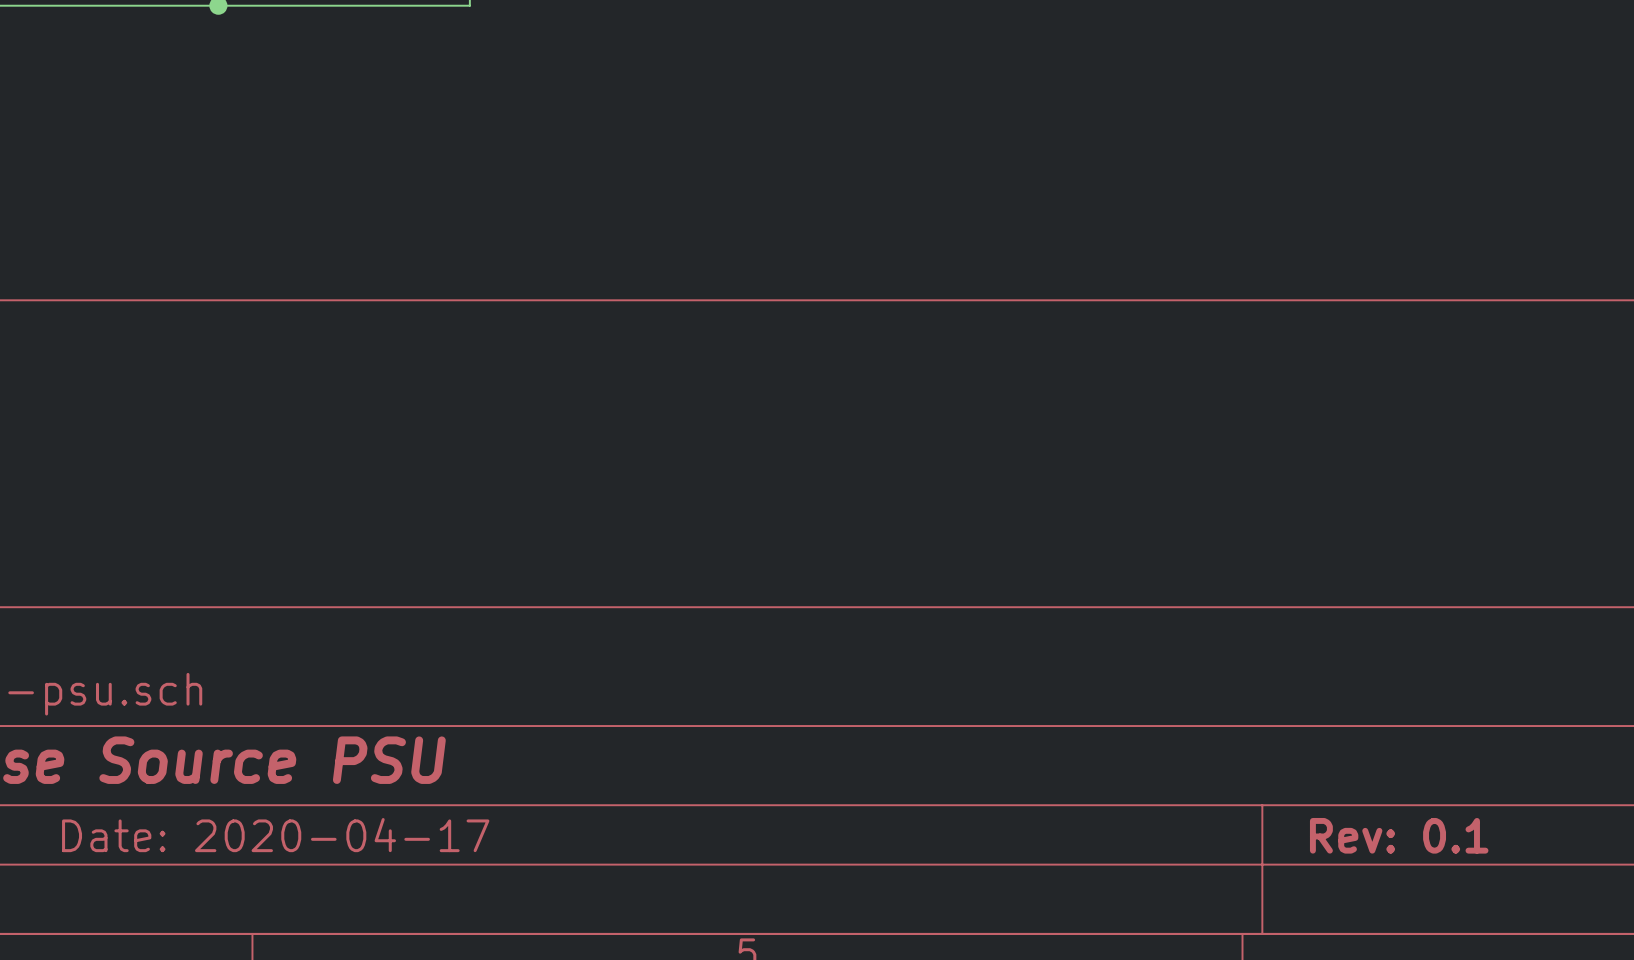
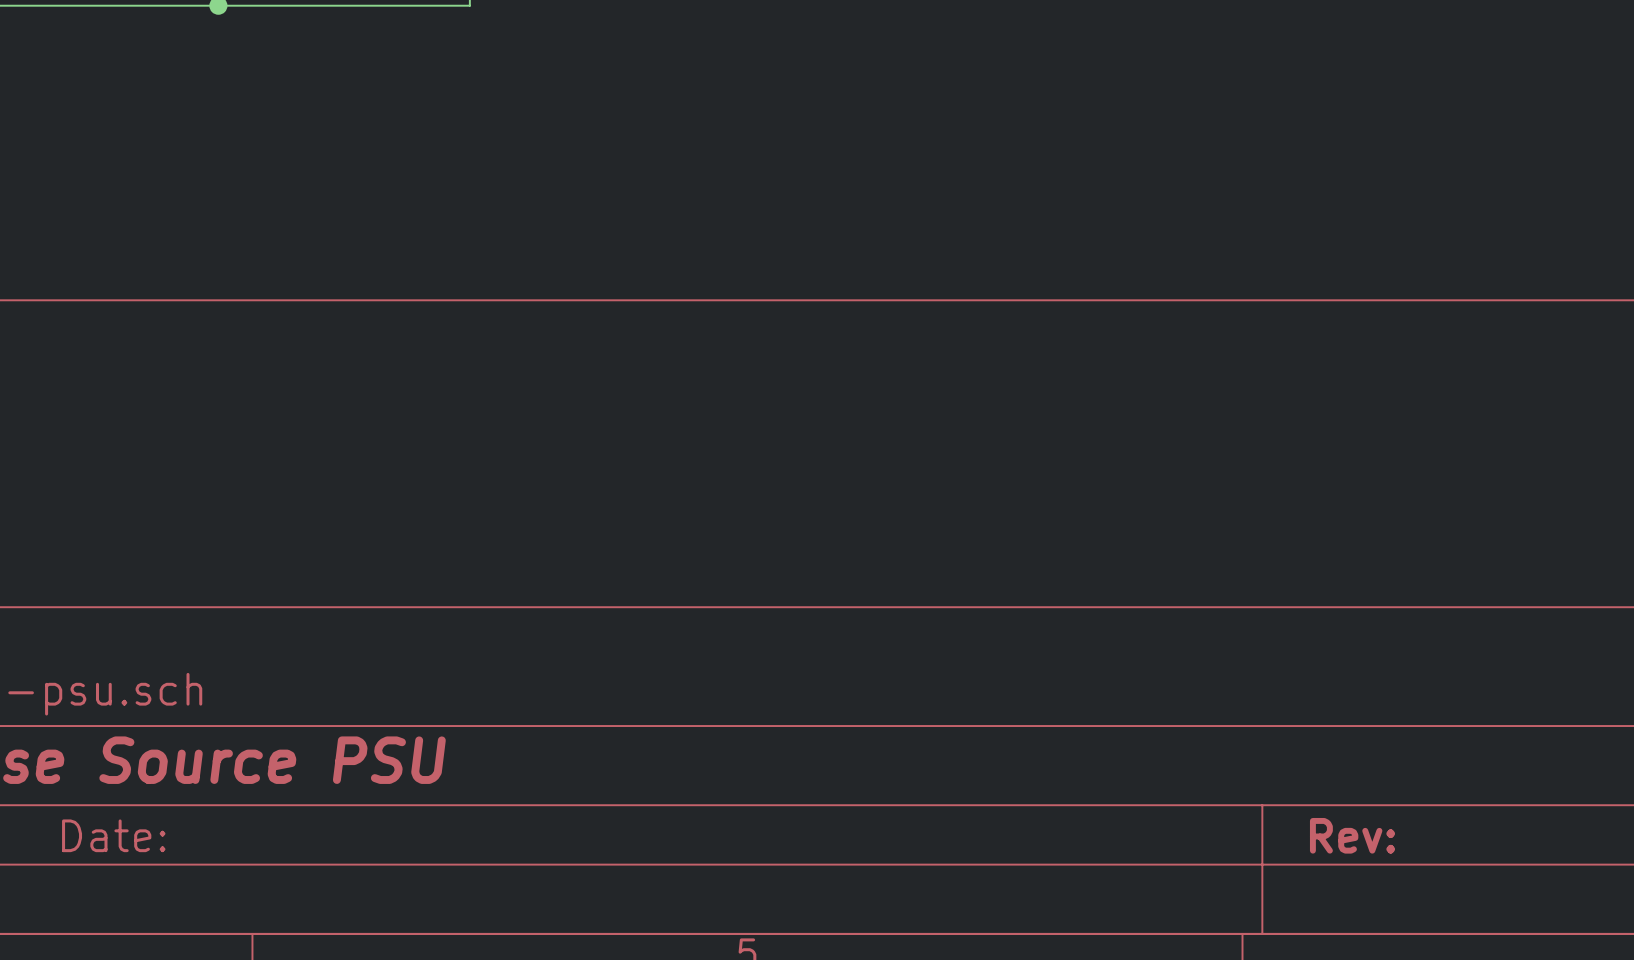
title block: Date: 2020-04-17 (275, 835) -> Date: (113, 835)
title block: Rev: 0.1 (1399, 835) -> Rev: (1352, 835)

